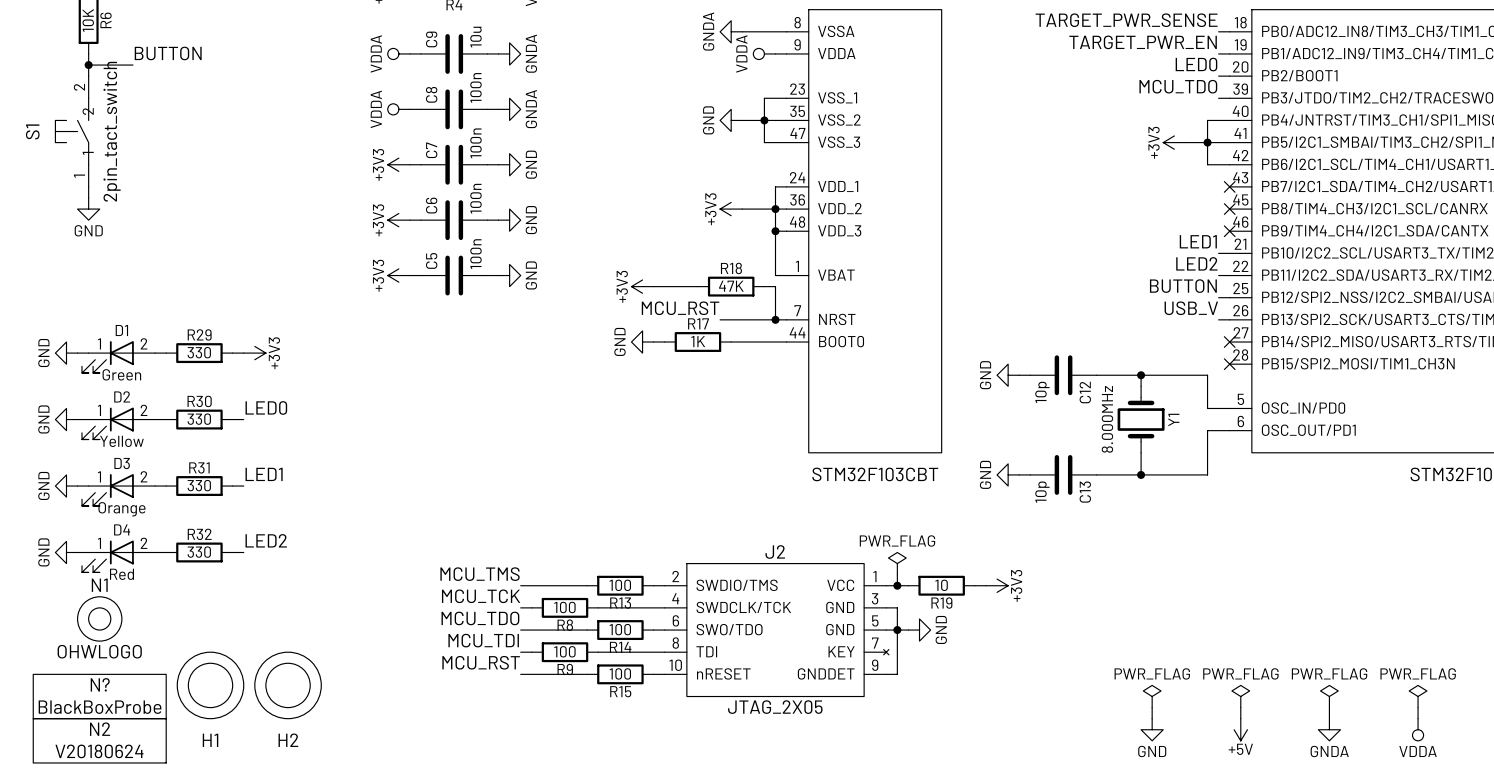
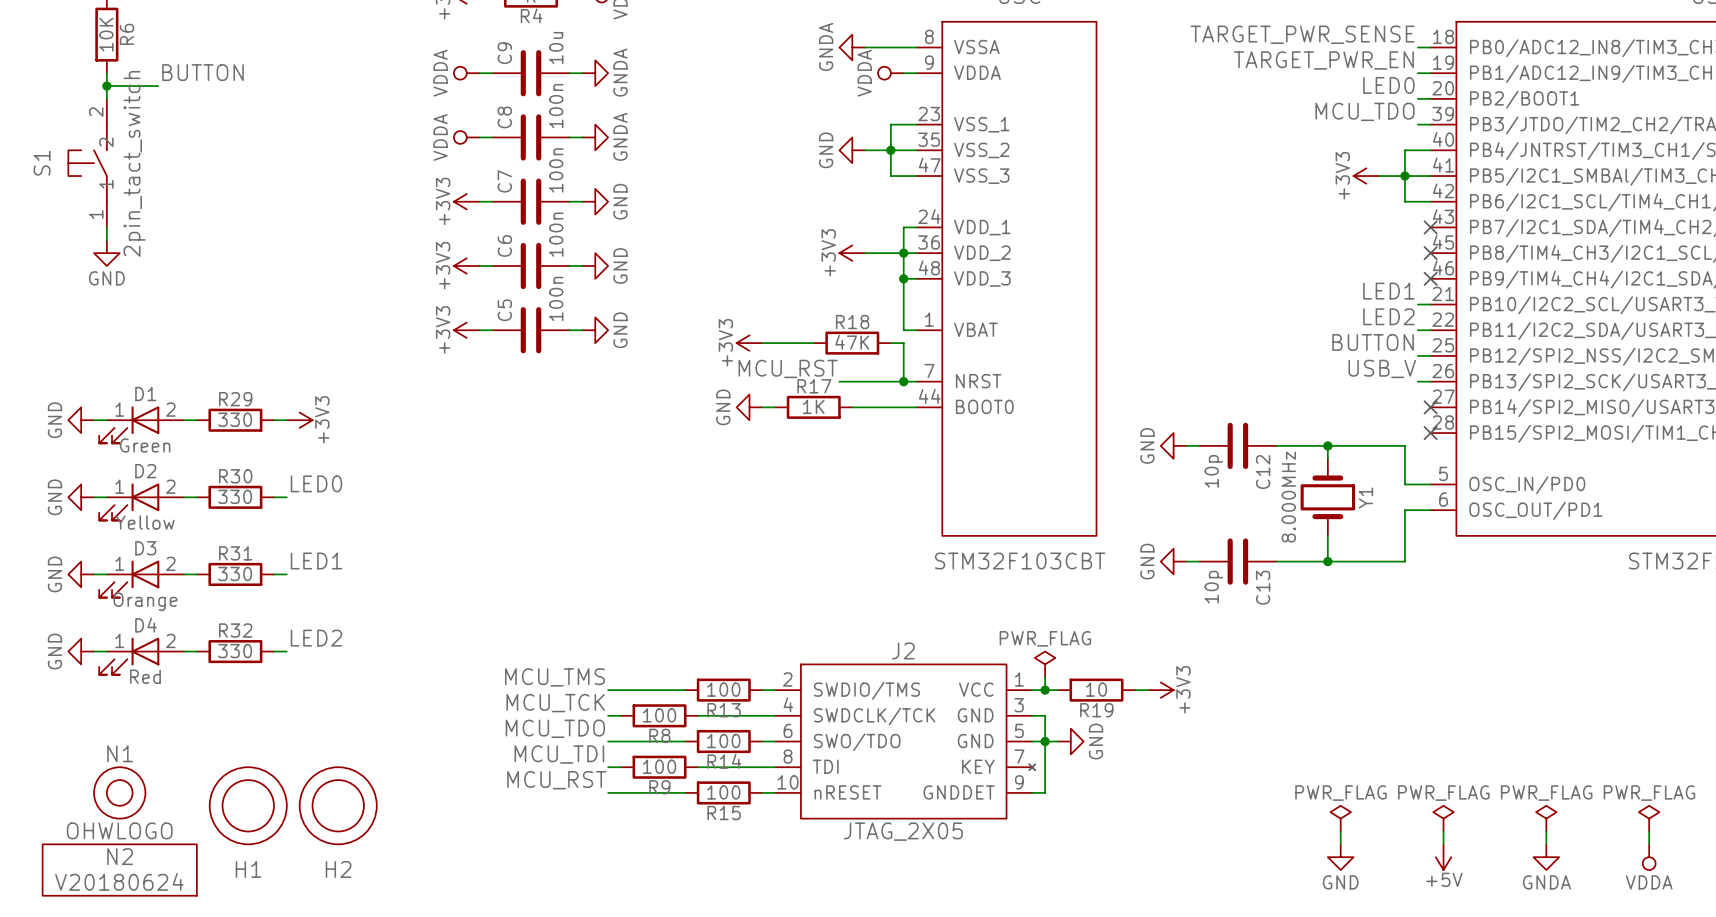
N1 position: (99, 618) -> (119, 792)
N?: BlackBoxProbe (99, 696) -> none

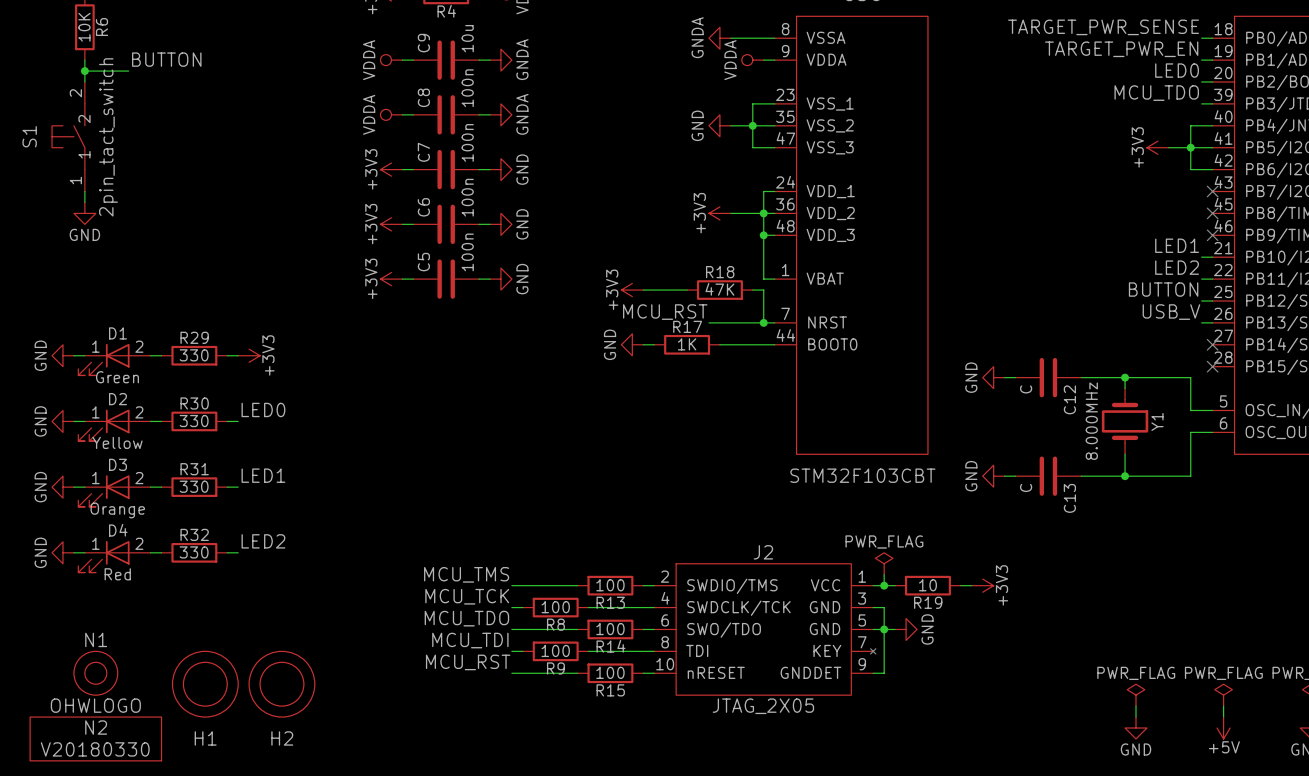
C12 value: 10p (1213, 471) -> C (1026, 389)
C13 value: 10p (1213, 587) -> C (1026, 487)
N2 value: V20180624 (119, 881) -> V20180330 (95, 749)

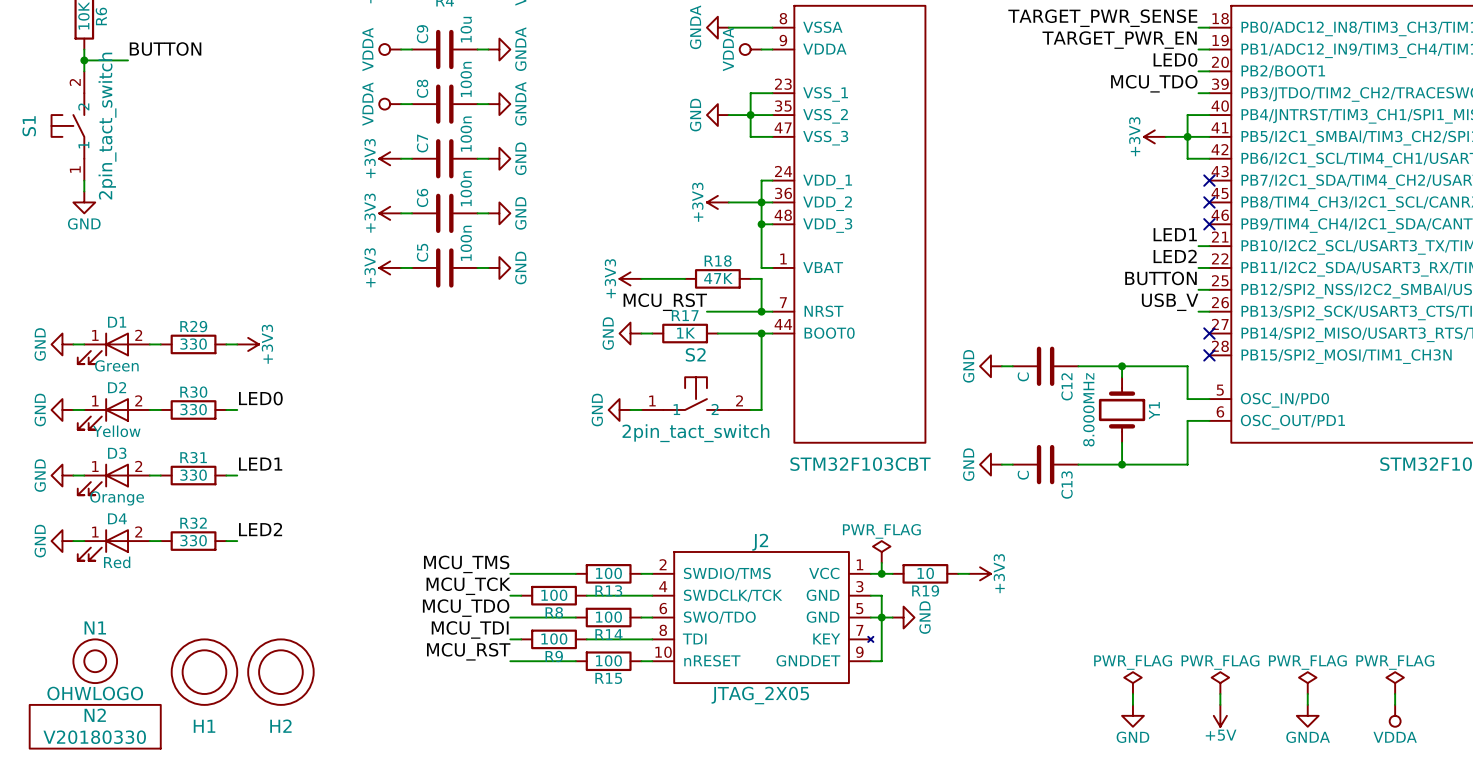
wire: none -> (761, 333) (761, 409) (750, 409)
junction: none -> (761, 333)
S2: none -> 2pin_tact_switch (696, 393)
power symbol: none -> GND (619, 409)
wire: none -> (630, 409) (641, 409)

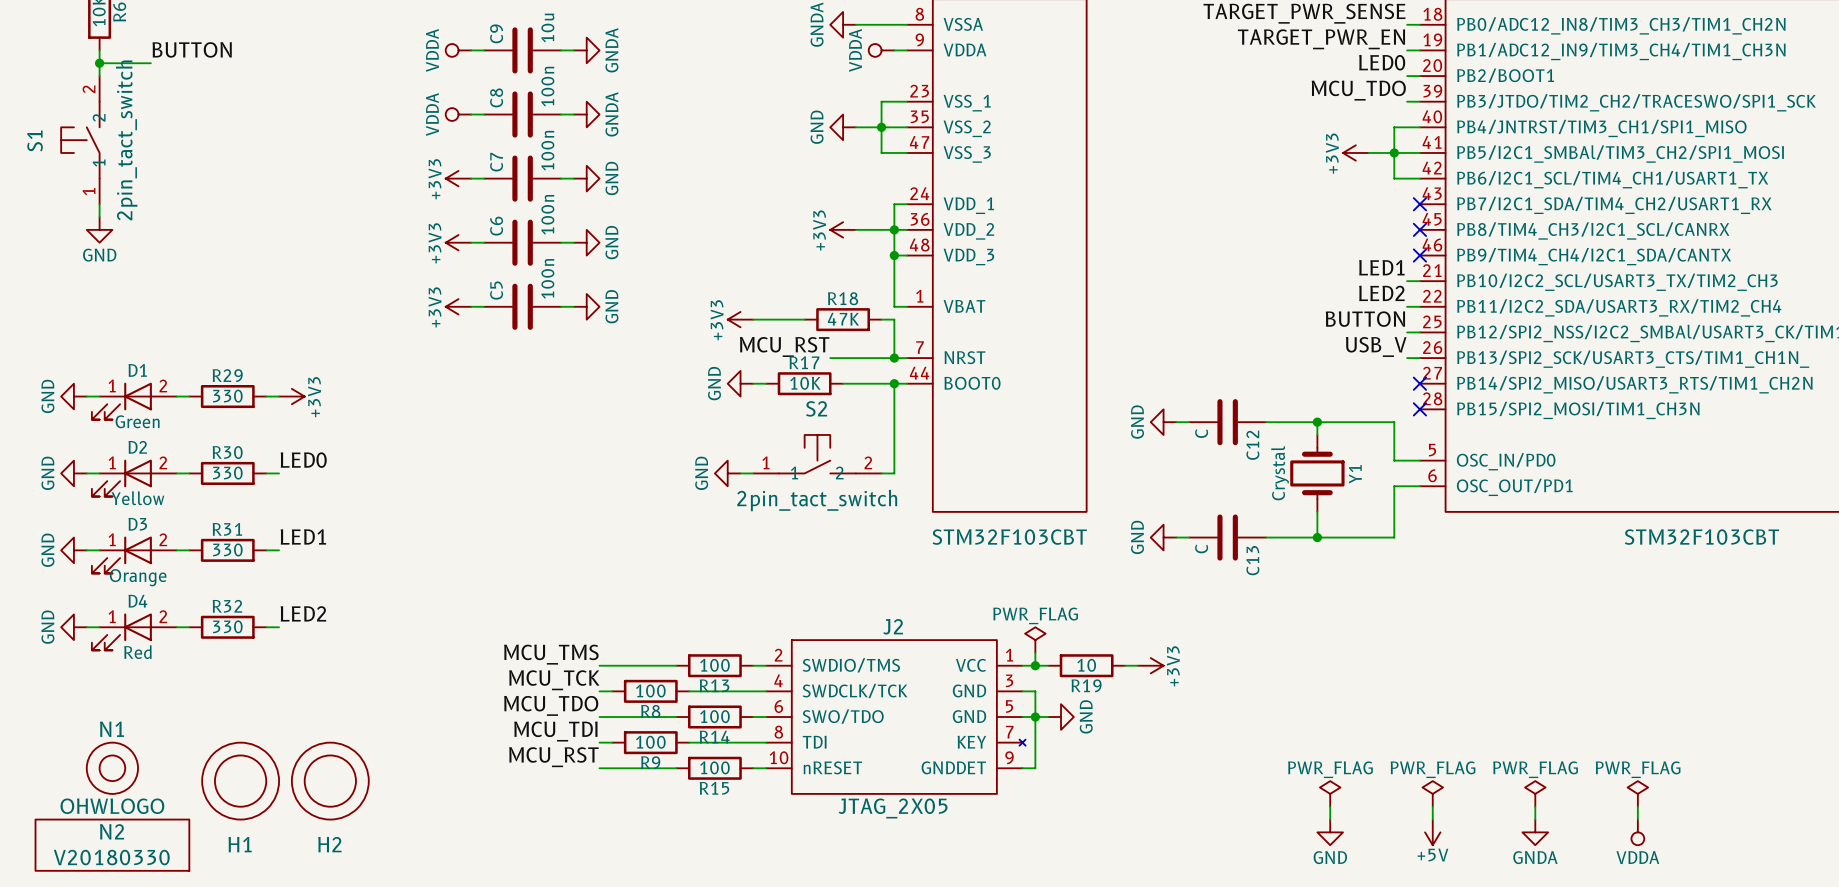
R17 value: 1K (686, 333) -> 10K (805, 383)
Y1 value: 8.000MHz (1088, 409) -> Crystal (1280, 473)

